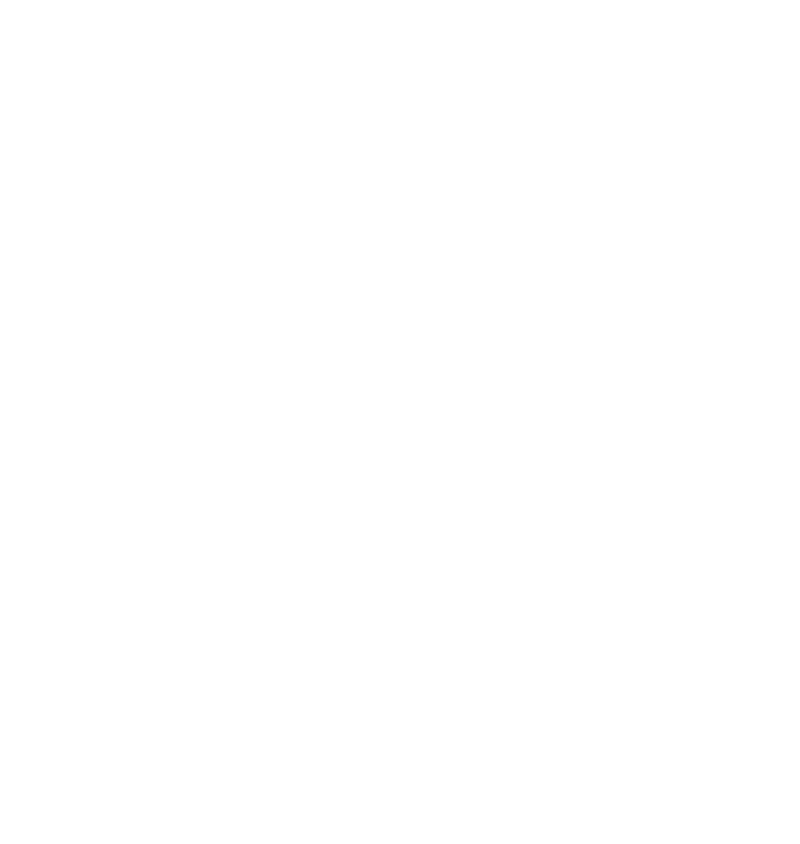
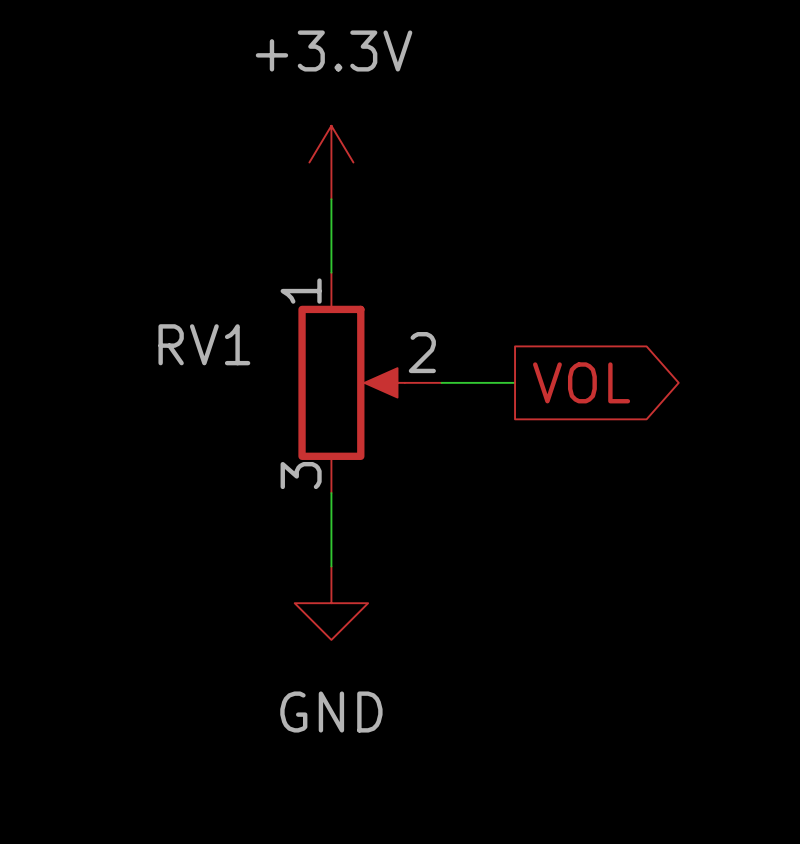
power symbol: none -> +3.3V (331, 162)
wire: none -> (331, 199) (331, 272)
RV1: none -> (369, 382)
wire: none -> (441, 382) (515, 382)
global label: none -> VOL (581, 382)
wire: none -> (331, 493) (331, 566)
power symbol: none -> GND (331, 603)

